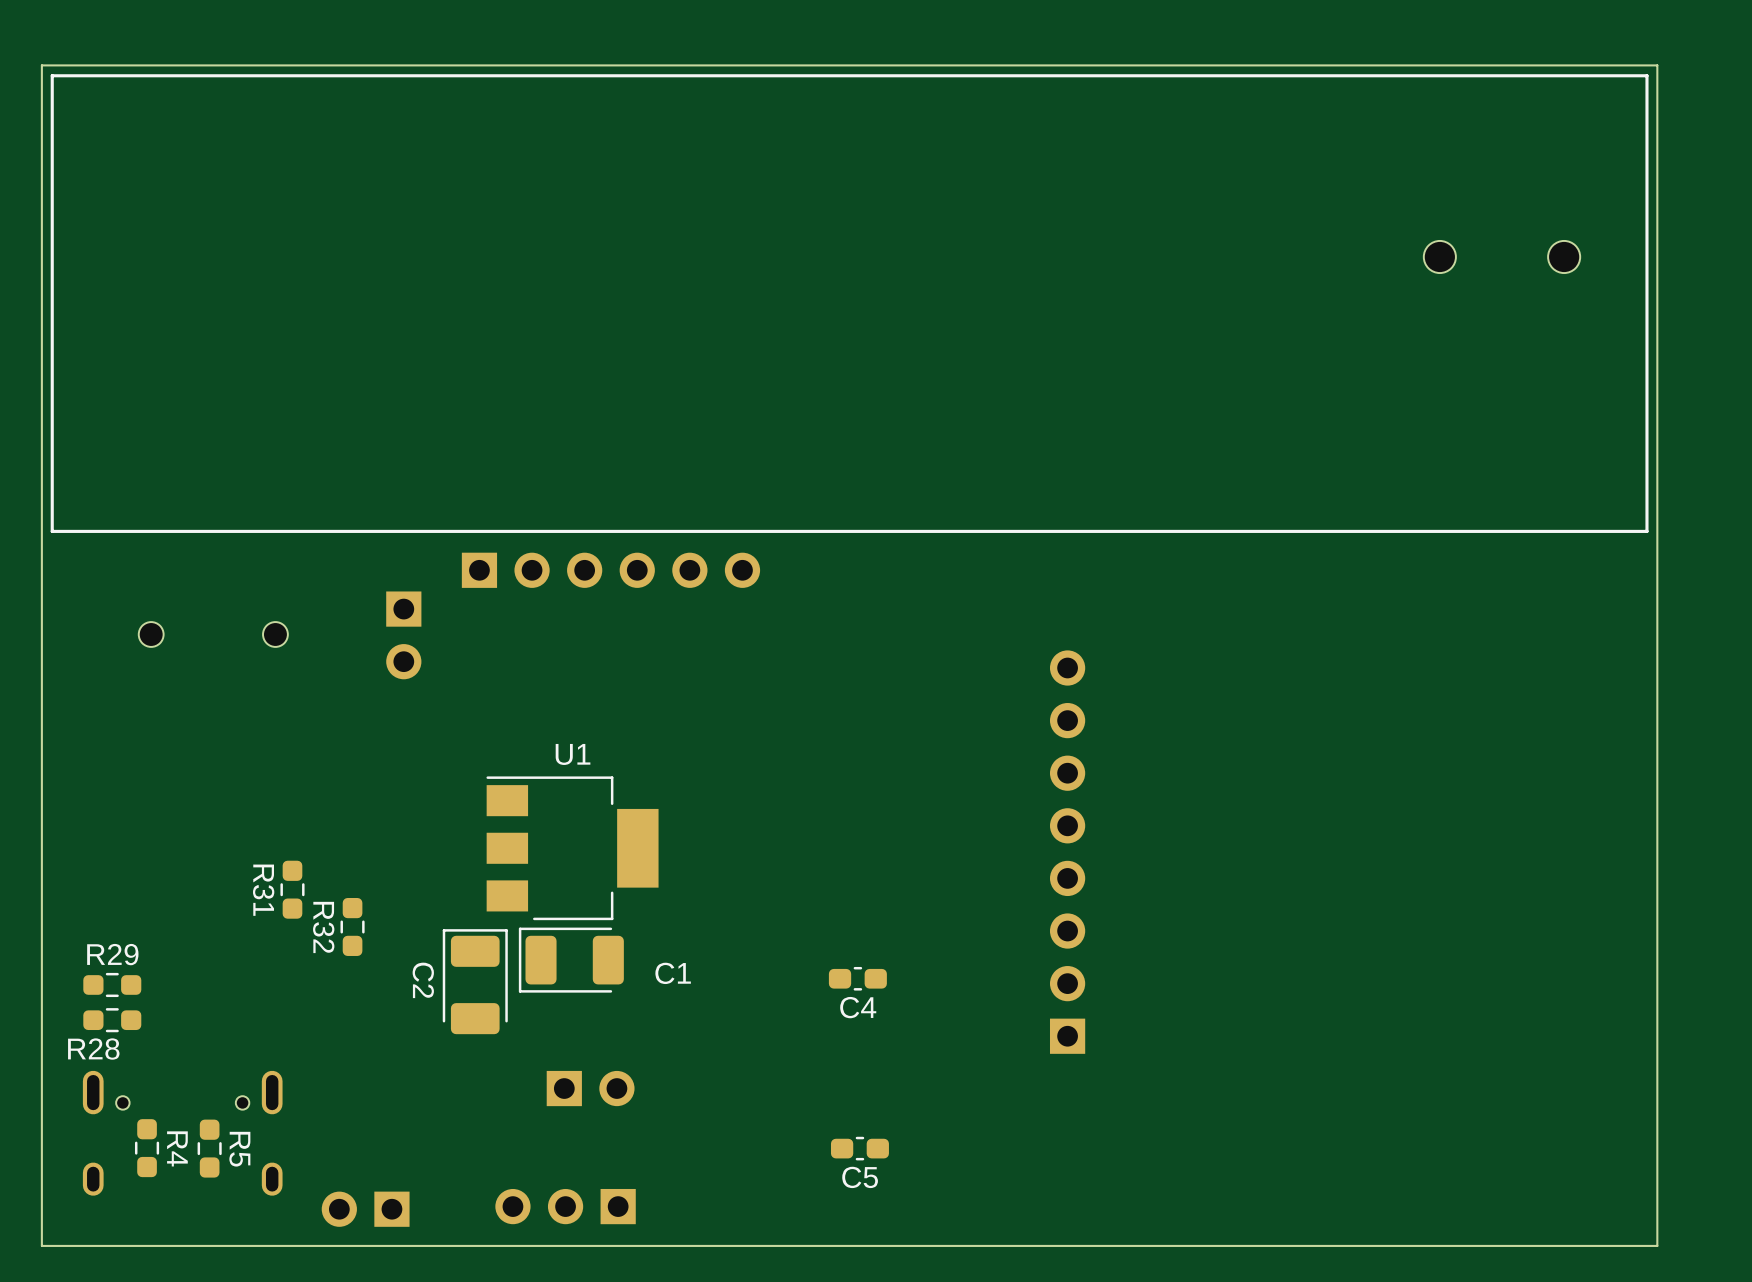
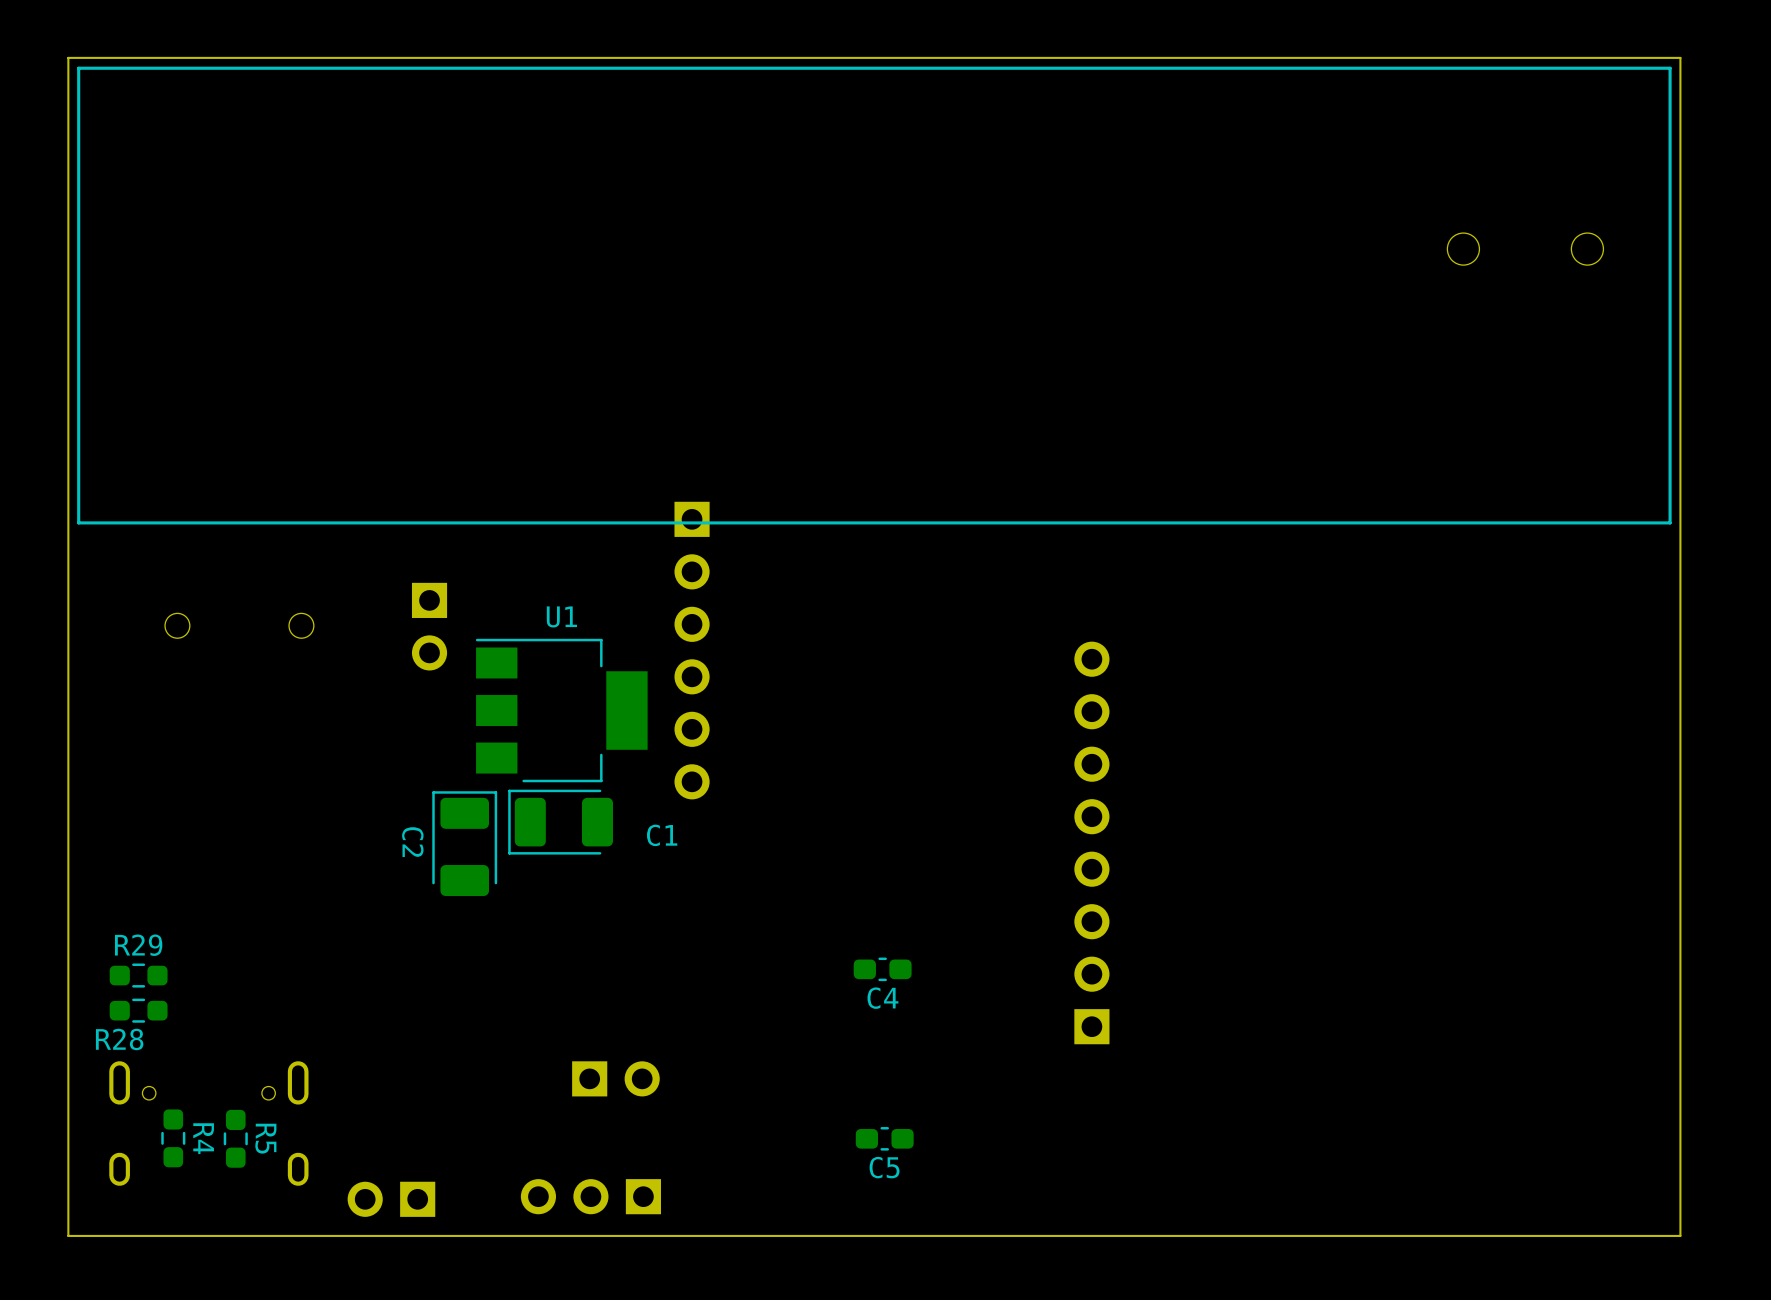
part rotation: 0° (610, 570) -> 90° clockwise (692, 650)
U1 position: (572, 848) -> (561, 710)
R31: (292, 889) -> none
R32: (352, 926) -> none
C1 position: (571, 960) -> (560, 822)
C2 position: (475, 981) -> (464, 843)

